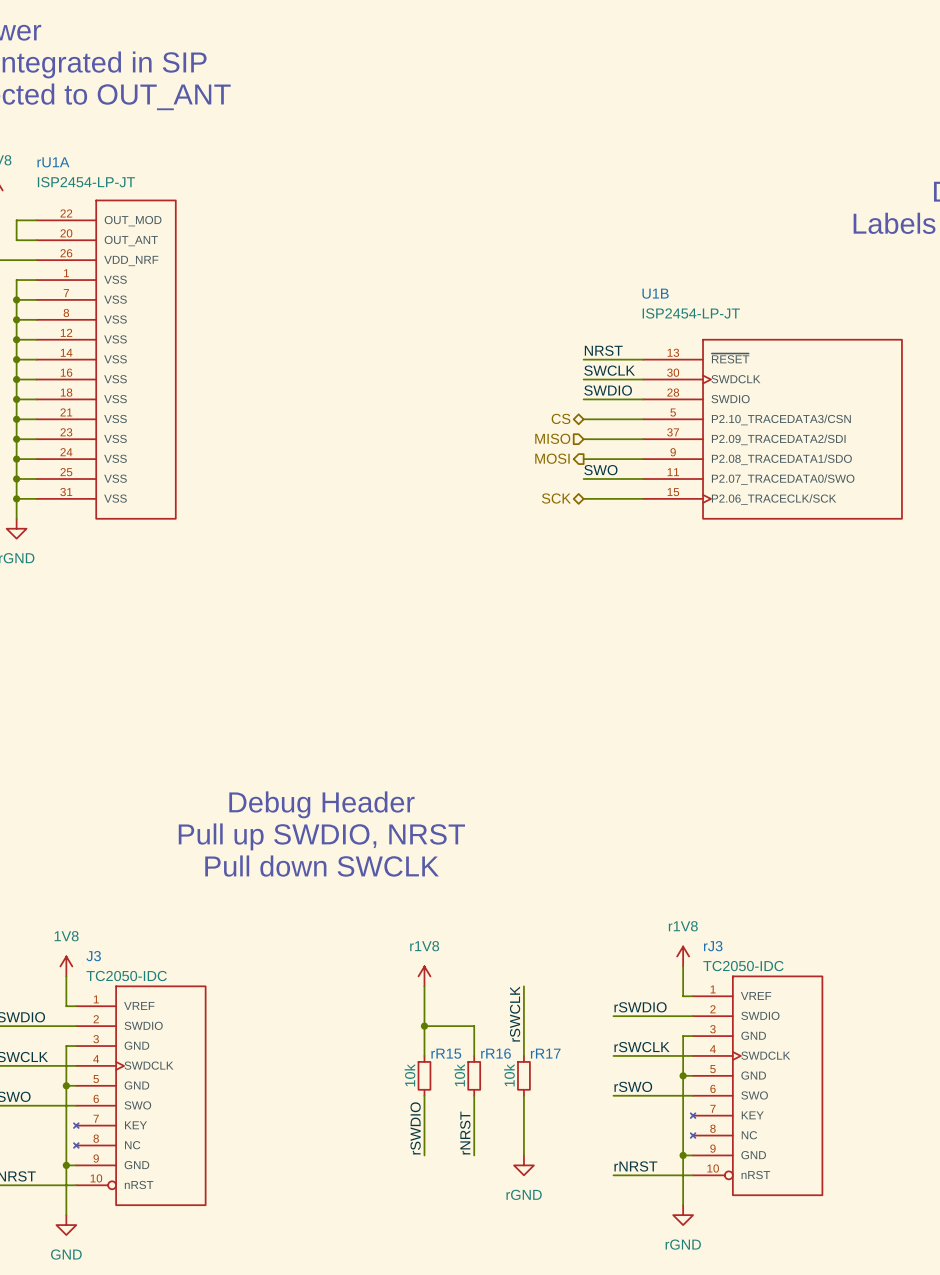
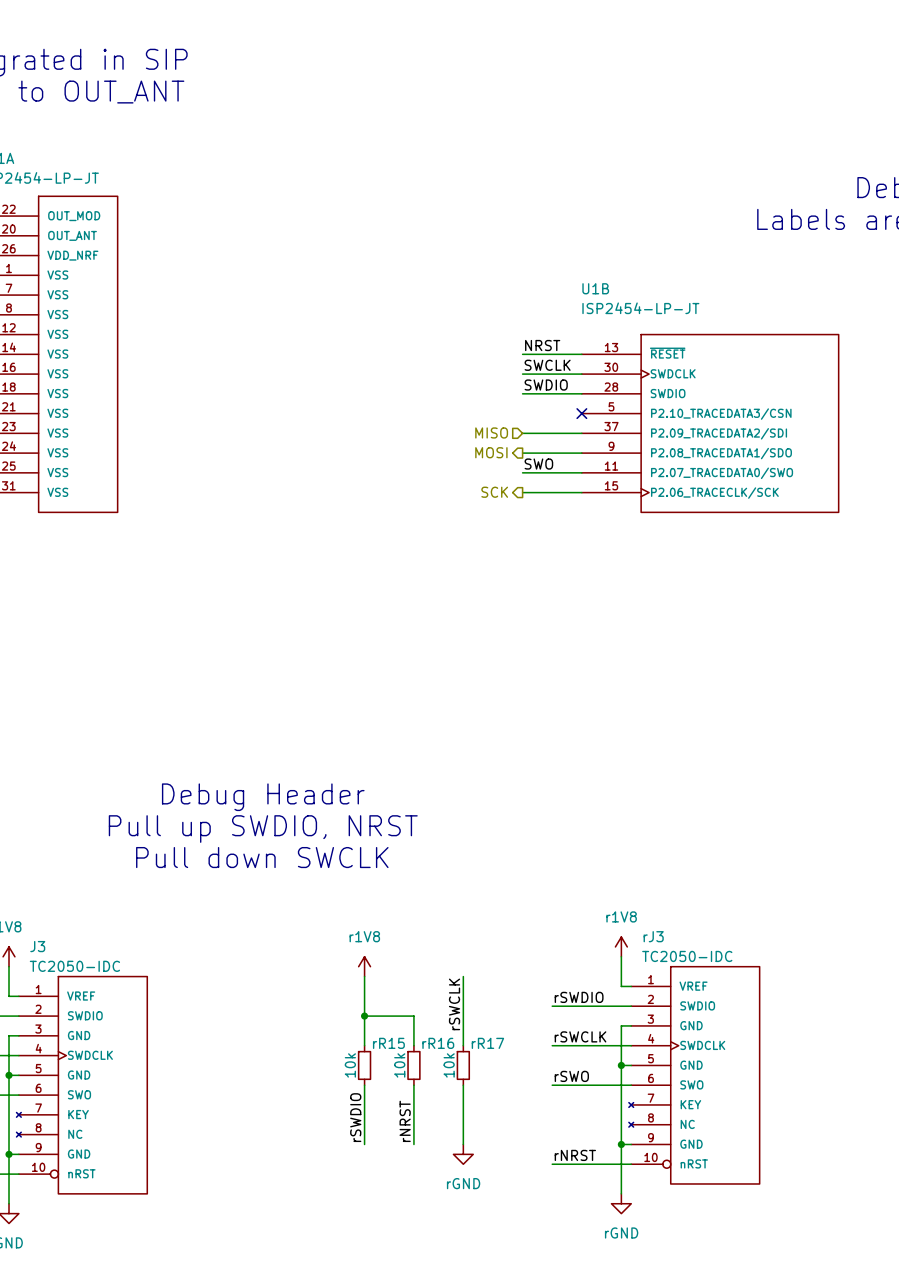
hierarchical label: CS (561, 418) -> none
wire: (583, 419) (643, 419) -> none
no-connect mark: none -> (581, 413)
hierarchical label shape: bidirectional (556, 498) -> output (494, 492)

